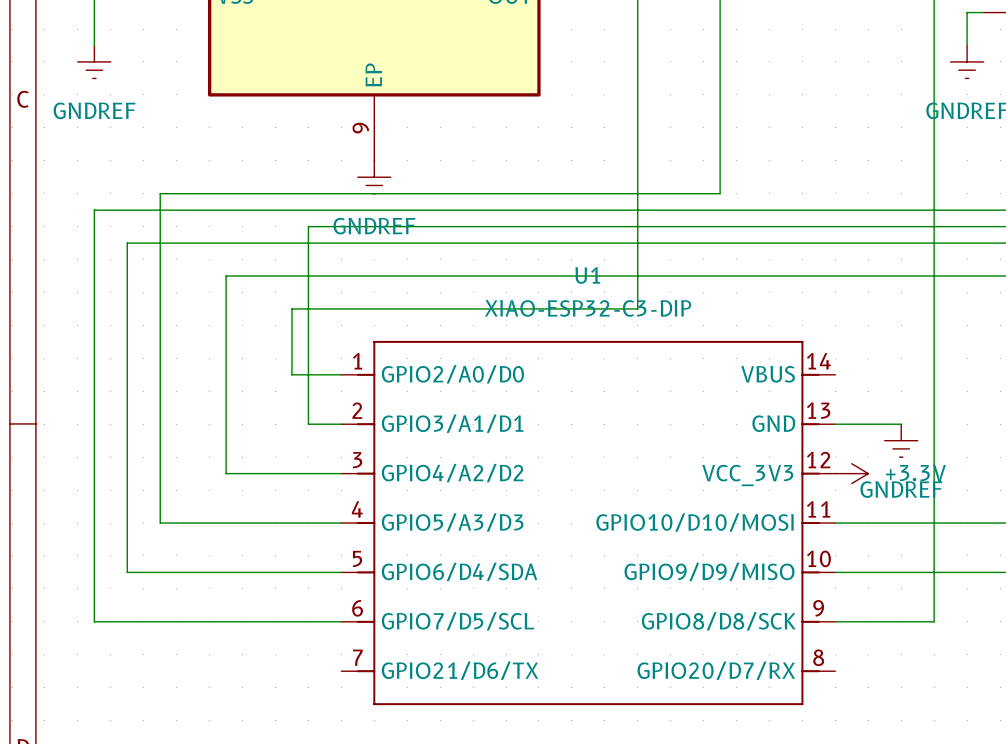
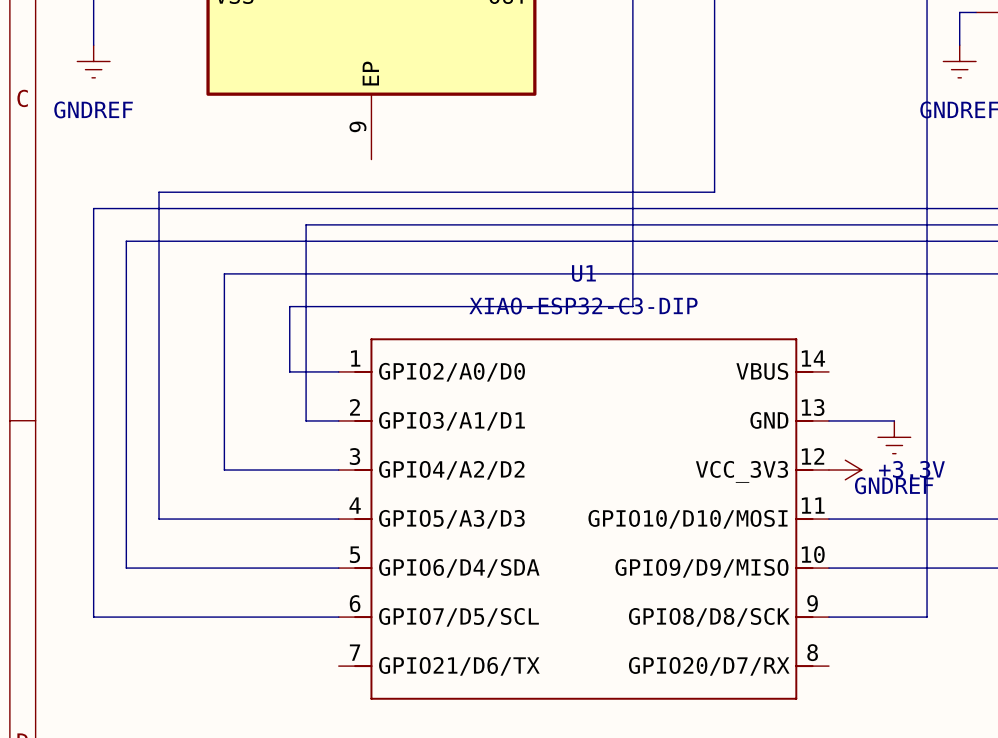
power symbol: GNDREF (374, 177) -> none

